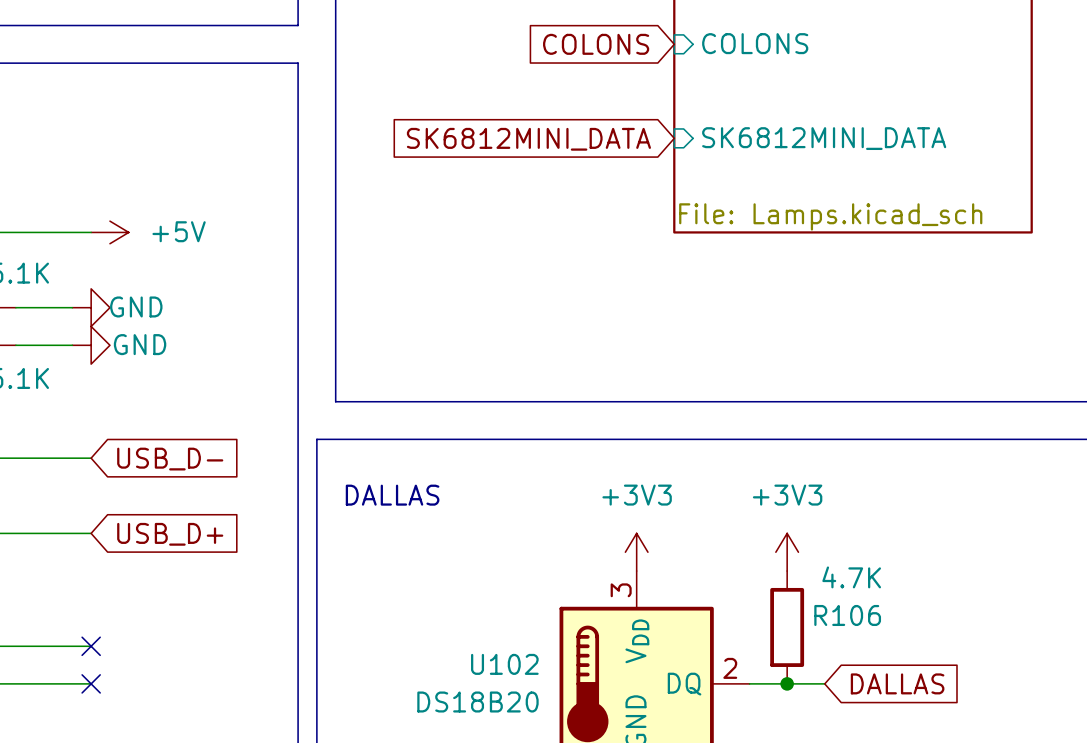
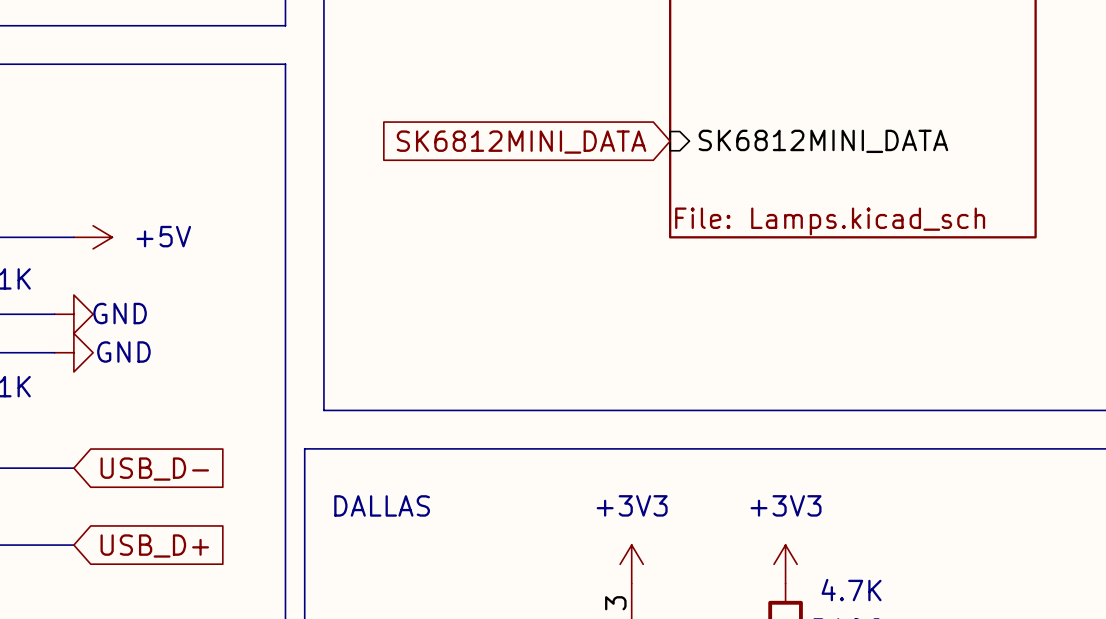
sheet pin: COLONS (755, 43) -> none
global label: COLONS (596, 44) -> none

